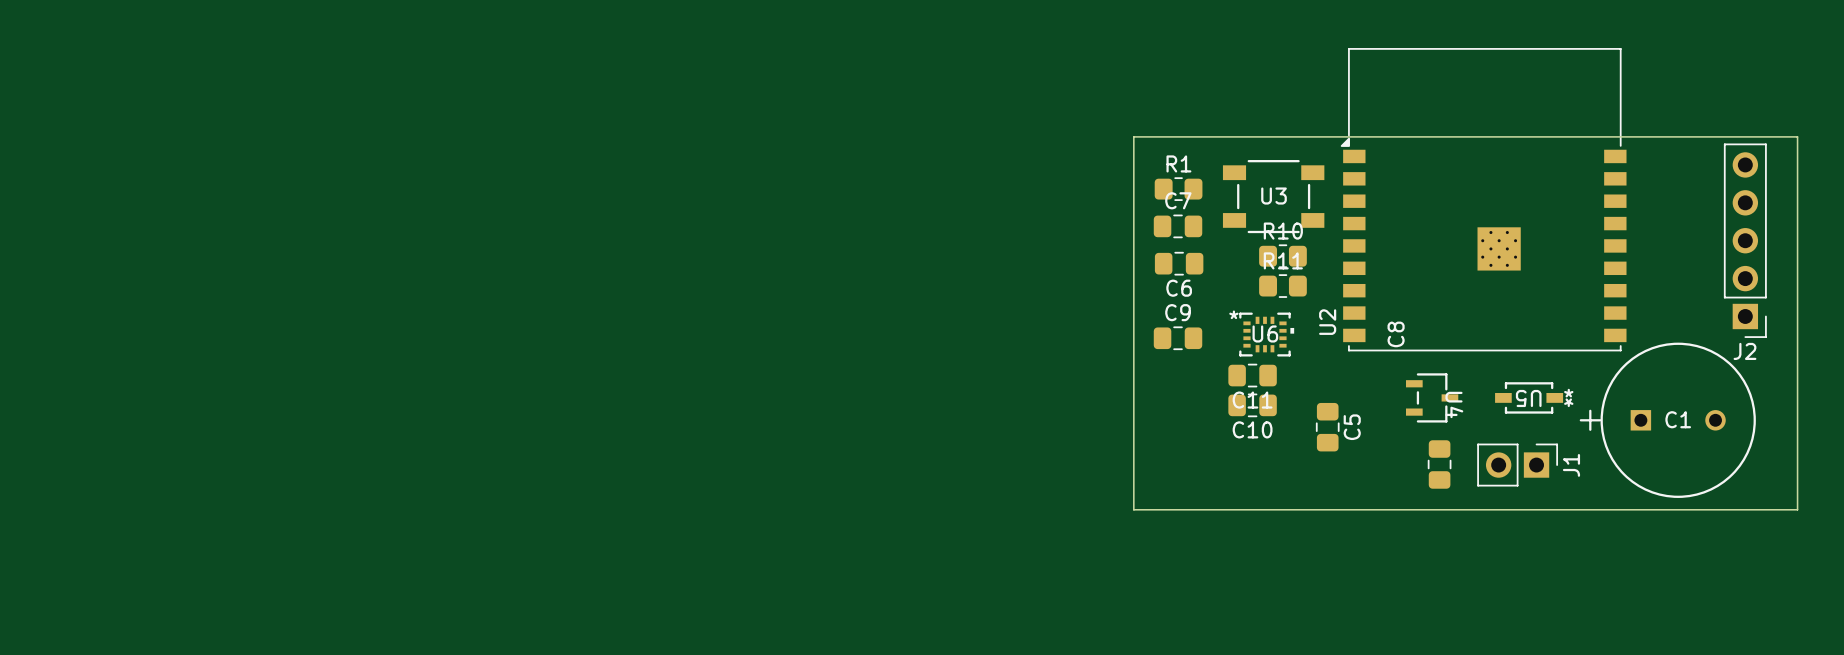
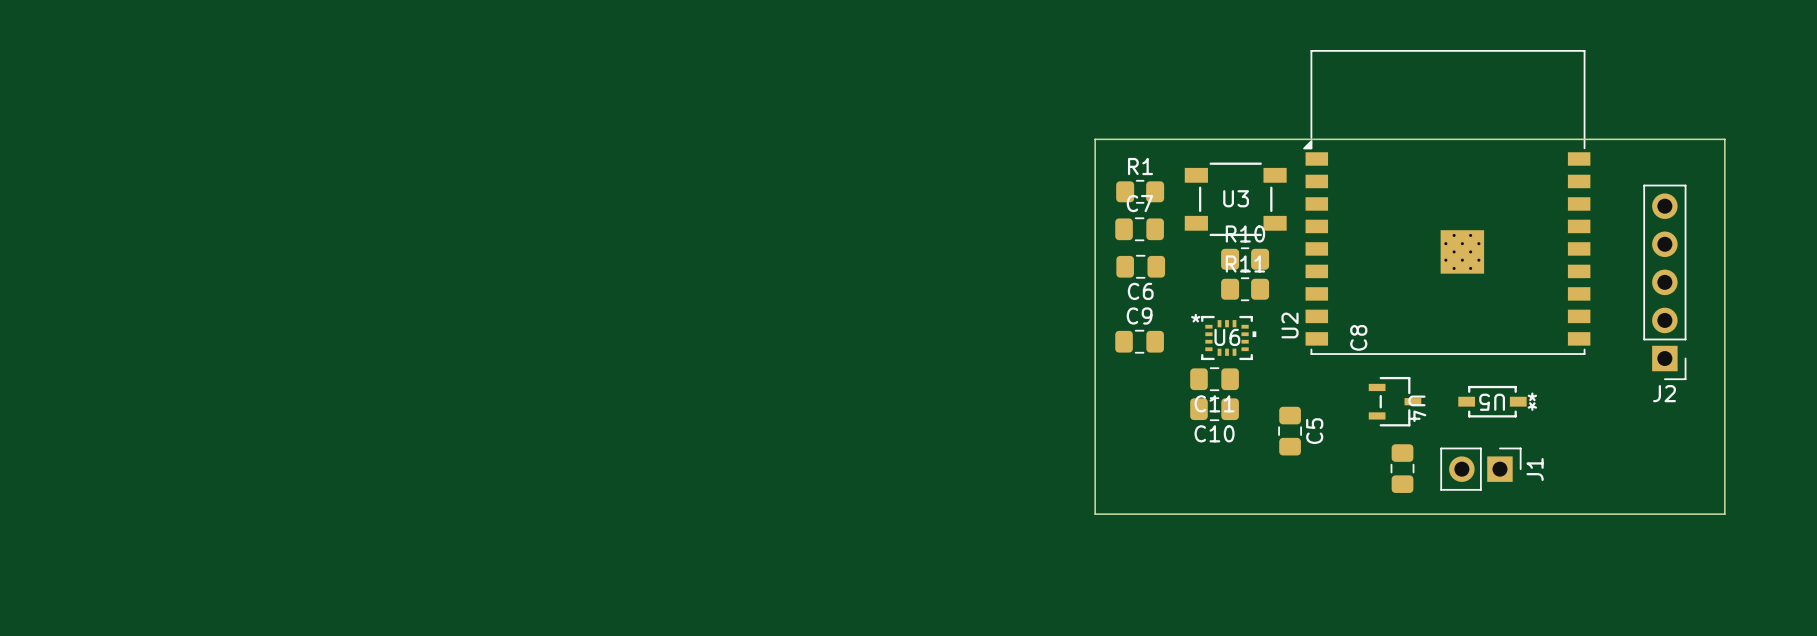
board edge: (1760, 136) (1797, 136) (1797, 509) (1760, 509) -> (1724, 139) (1724, 514)
J2 position: (1745, 240) -> (1664, 282)
C1: (1667, 420) -> none

